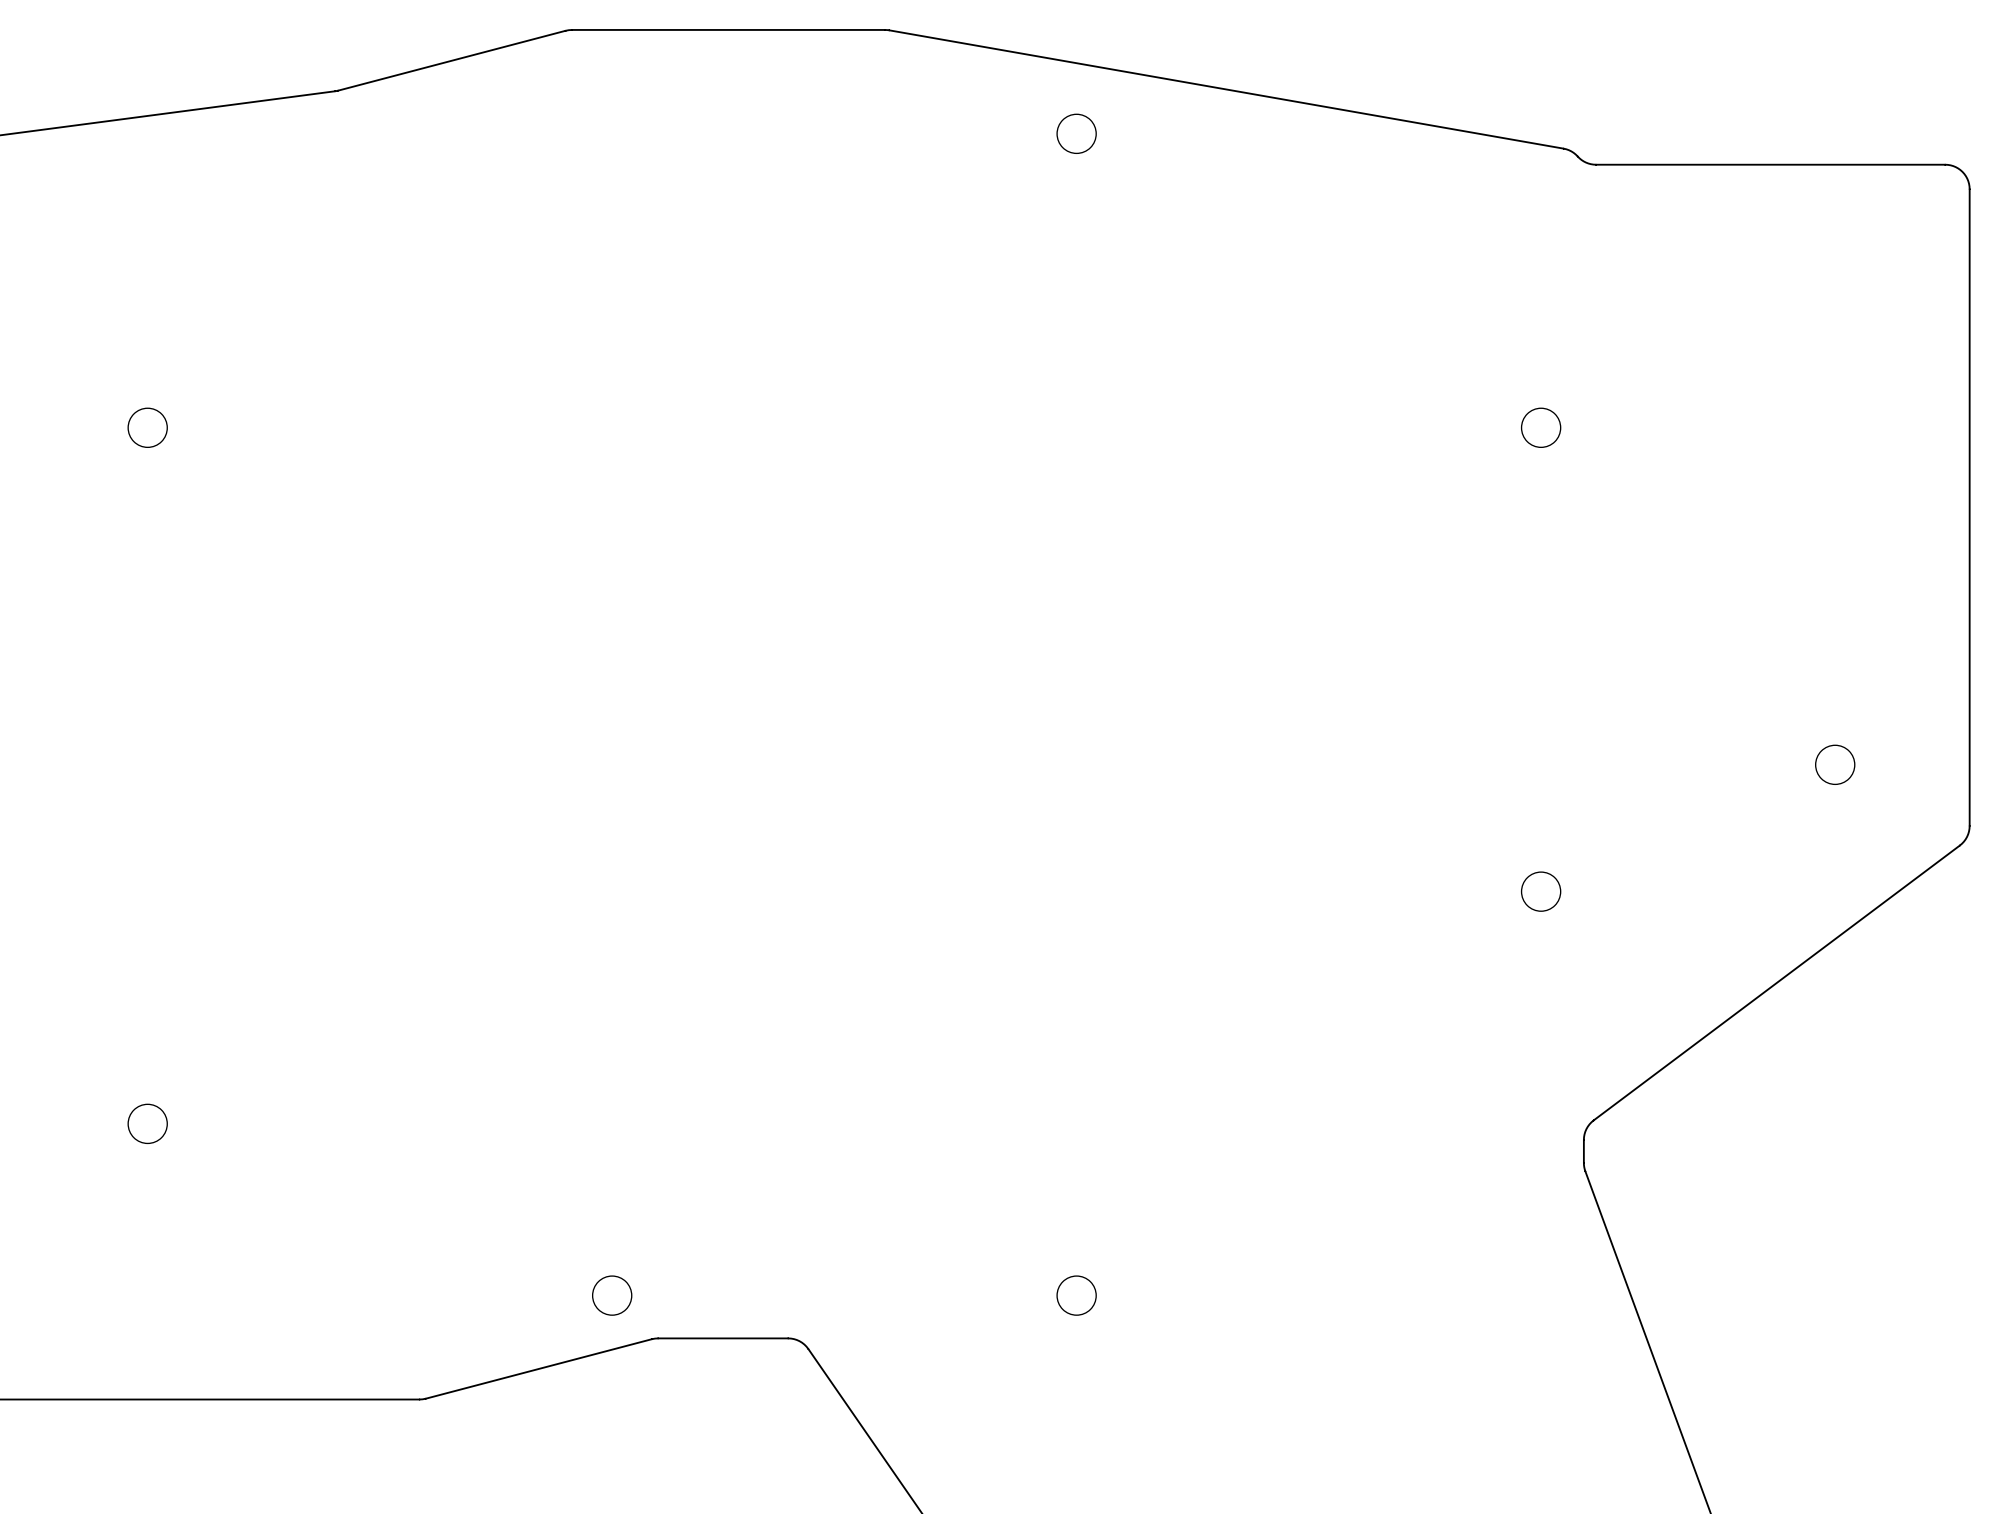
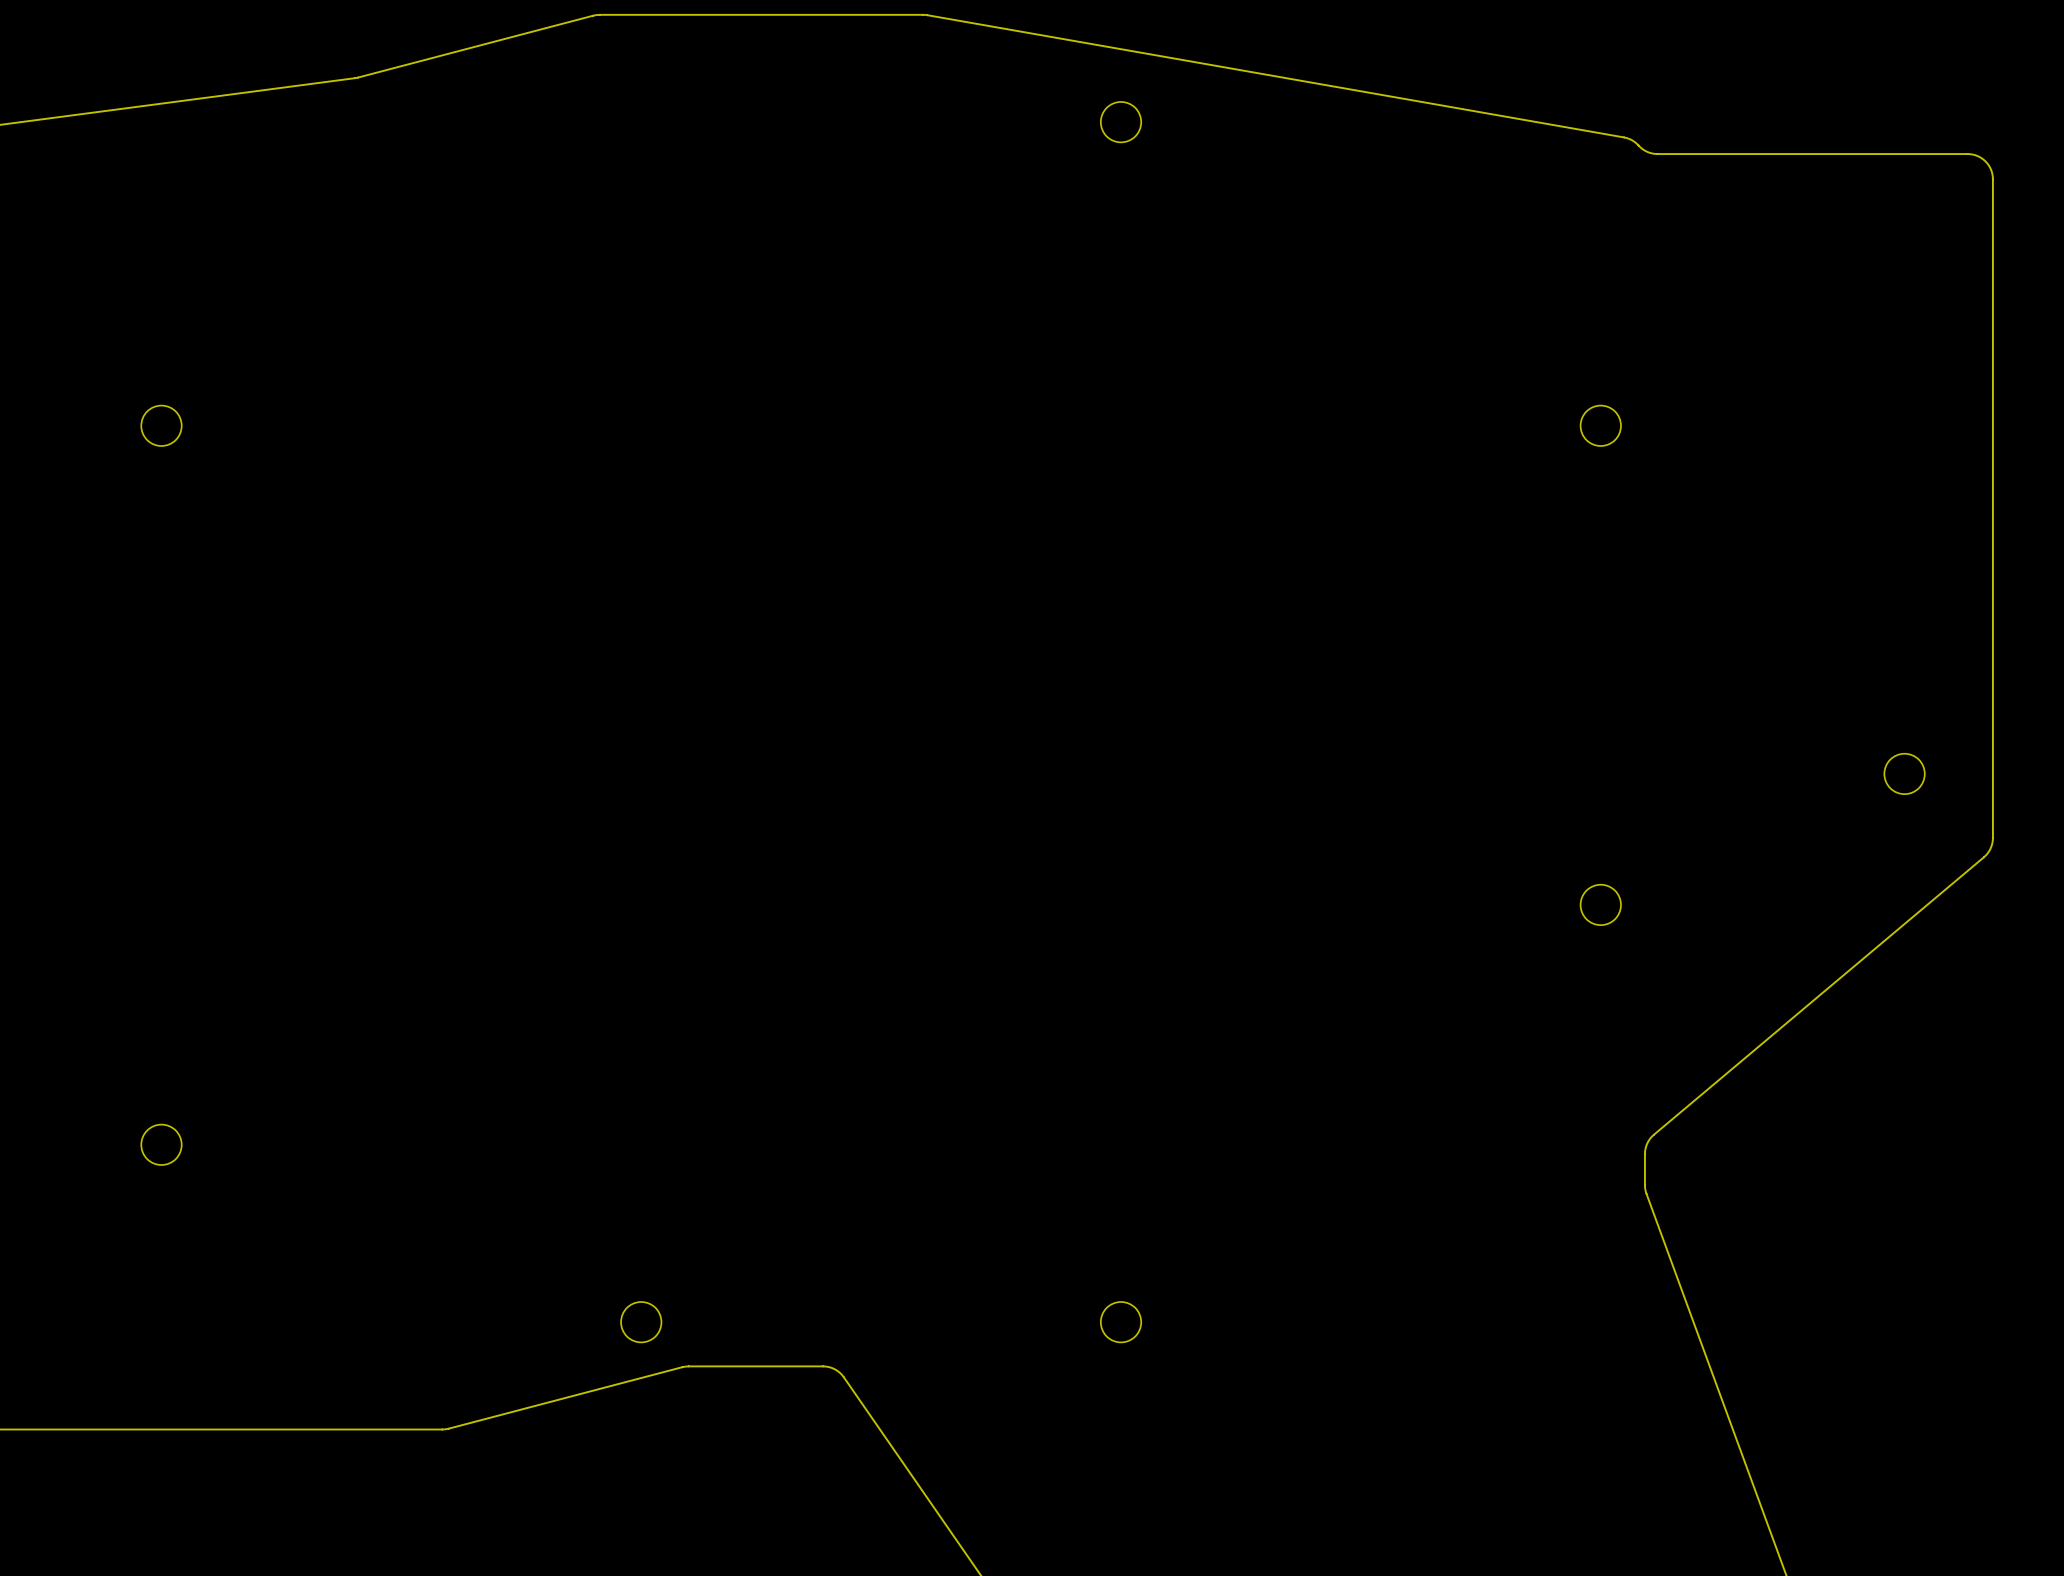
board edge: (1896, 164) (1953, 166) (1964, 173) (1969, 186) (1968, 834) (1959, 845) (1593, 1120) (1586, 1129) (1583, 1139) -> (1967, 154) (1978, 156) (1985, 161) (1990, 168) (1992, 179) (1991, 846) (1983, 857) (1653, 1134) (1646, 1145) (1644, 1161)

